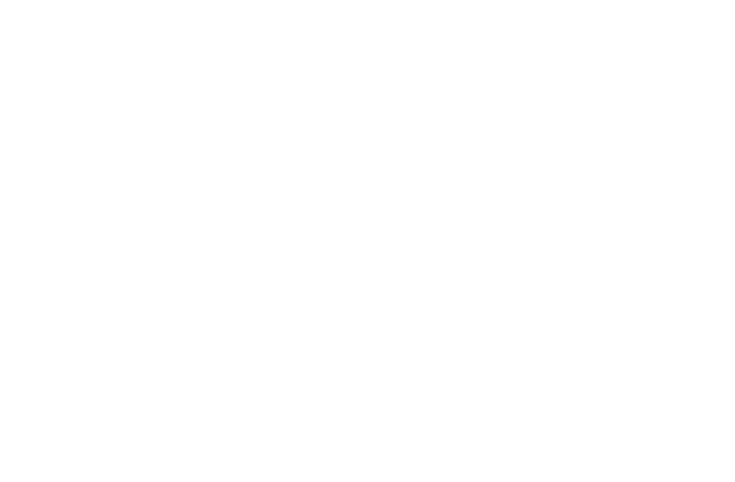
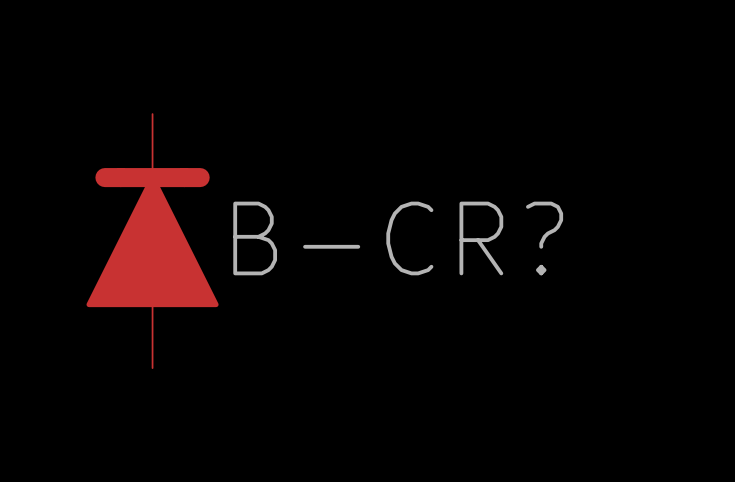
B-CR?: none -> (152, 241)

